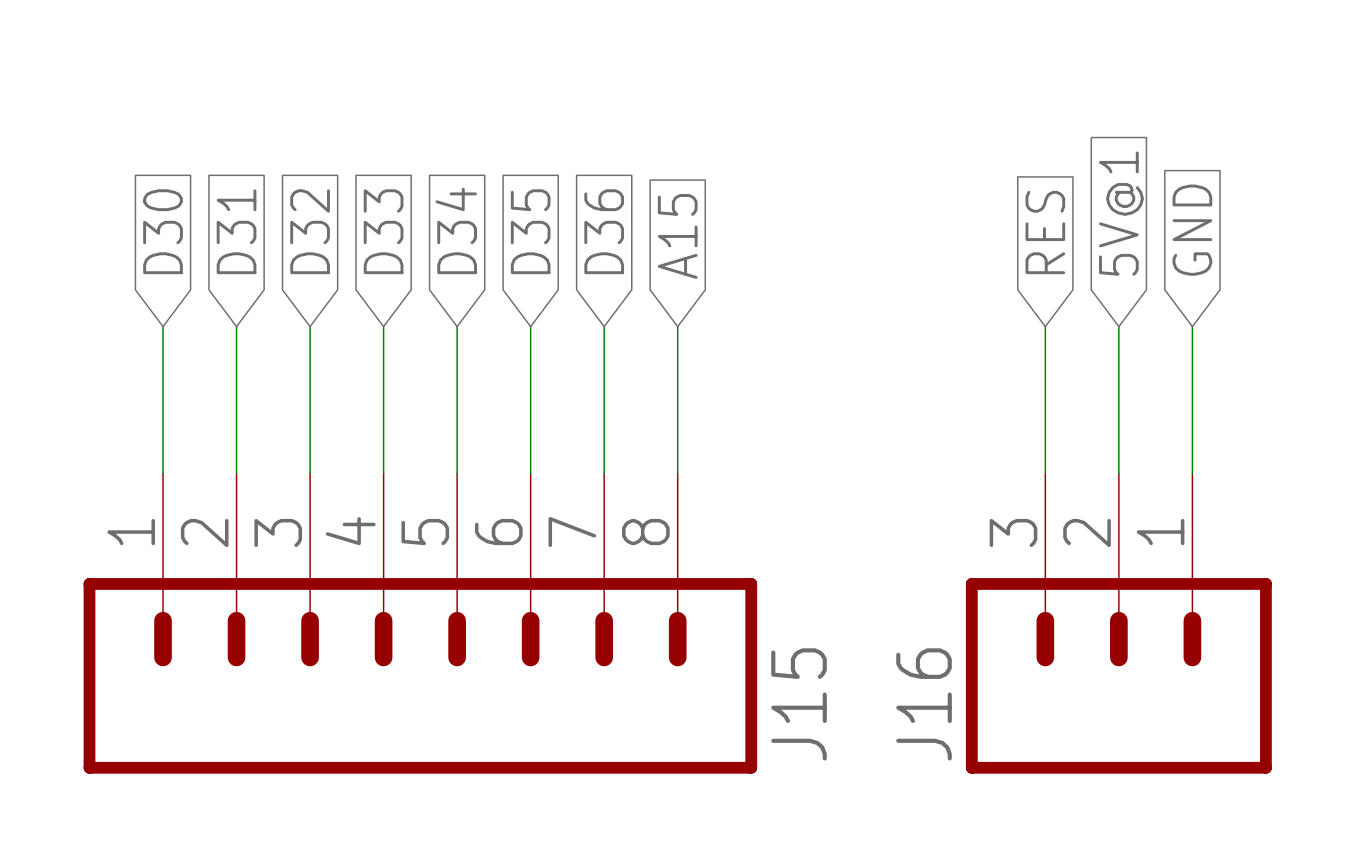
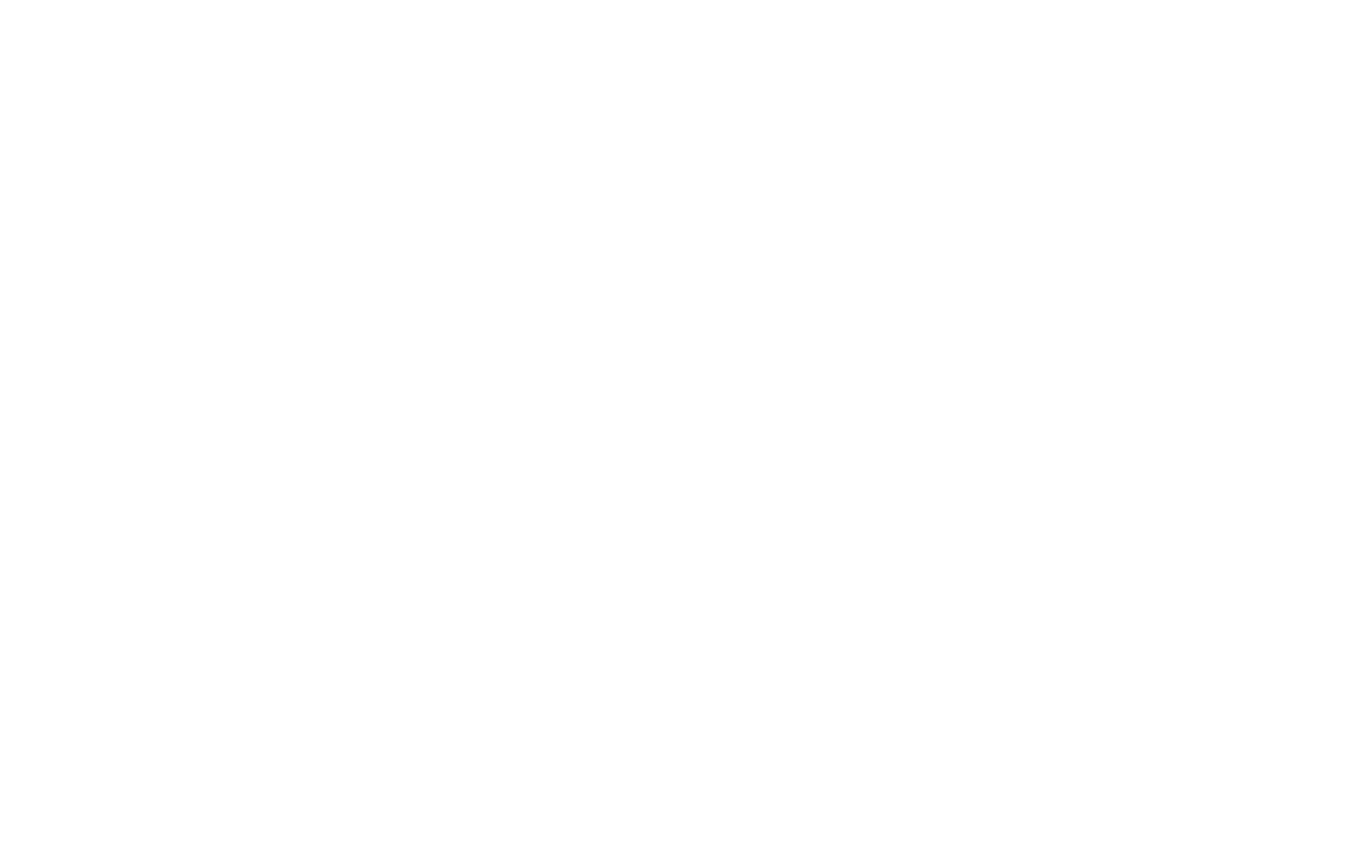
global label: 5V@1 (1121, 213) -> none
global label: D34 (456, 230) -> none
global label: GND (1192, 230) -> none
global label: D30 (163, 231) -> none
global label: D31 (236, 231) -> none
global label: D32 (310, 231) -> none
global label: D33 (383, 231) -> none
global label: D35 (530, 231) -> none
global label: D36 (604, 231) -> none
global label: RES (1045, 232) -> none
global label: A15 (677, 236) -> none
wire: (163, 326) (163, 473) -> none
wire: (236, 326) (236, 473) -> none
wire: (310, 326) (310, 473) -> none
wire: (383, 326) (383, 473) -> none
wire: (457, 326) (457, 473) -> none
wire: (530, 326) (530, 473) -> none
wire: (604, 326) (604, 473) -> none
wire: (677, 326) (677, 473) -> none
wire: (1045, 326) (1045, 473) -> none
wire: (1118, 326) (1118, 473) -> none
wire: (1192, 326) (1192, 473) -> none
J15: (420, 623) -> none
J16: (1118, 623) -> none

